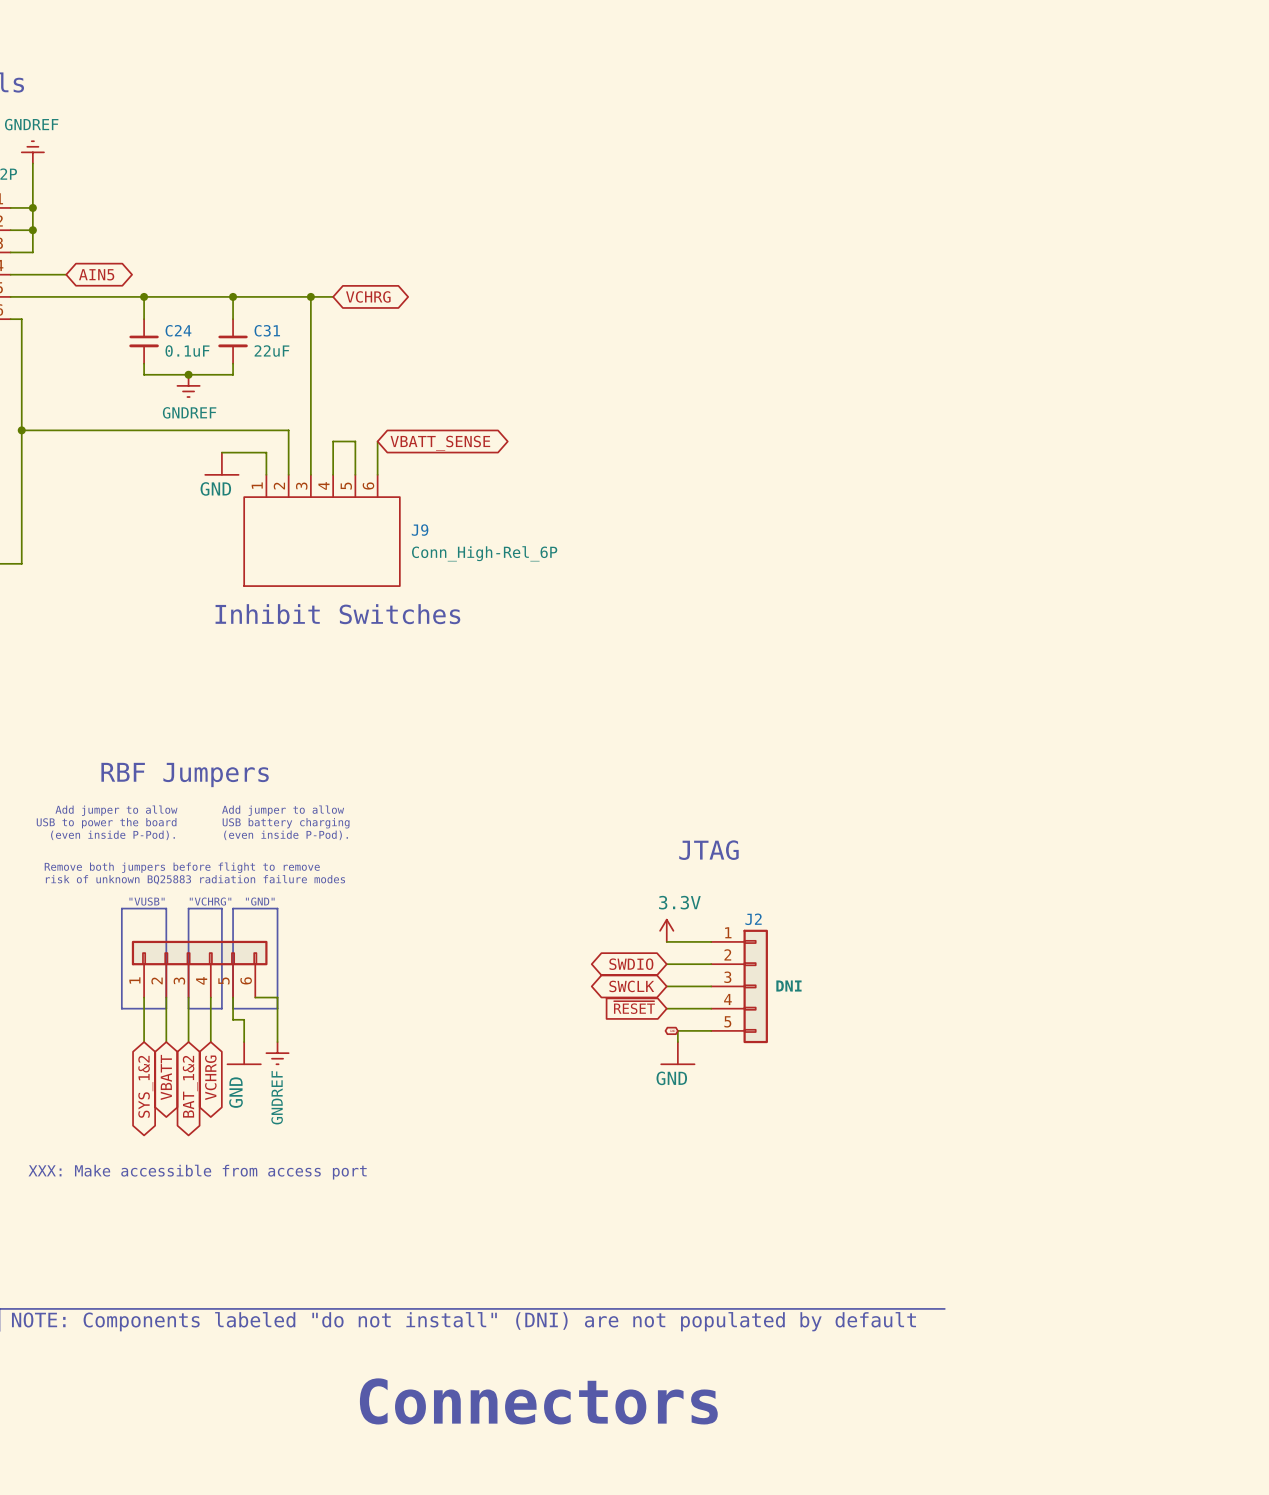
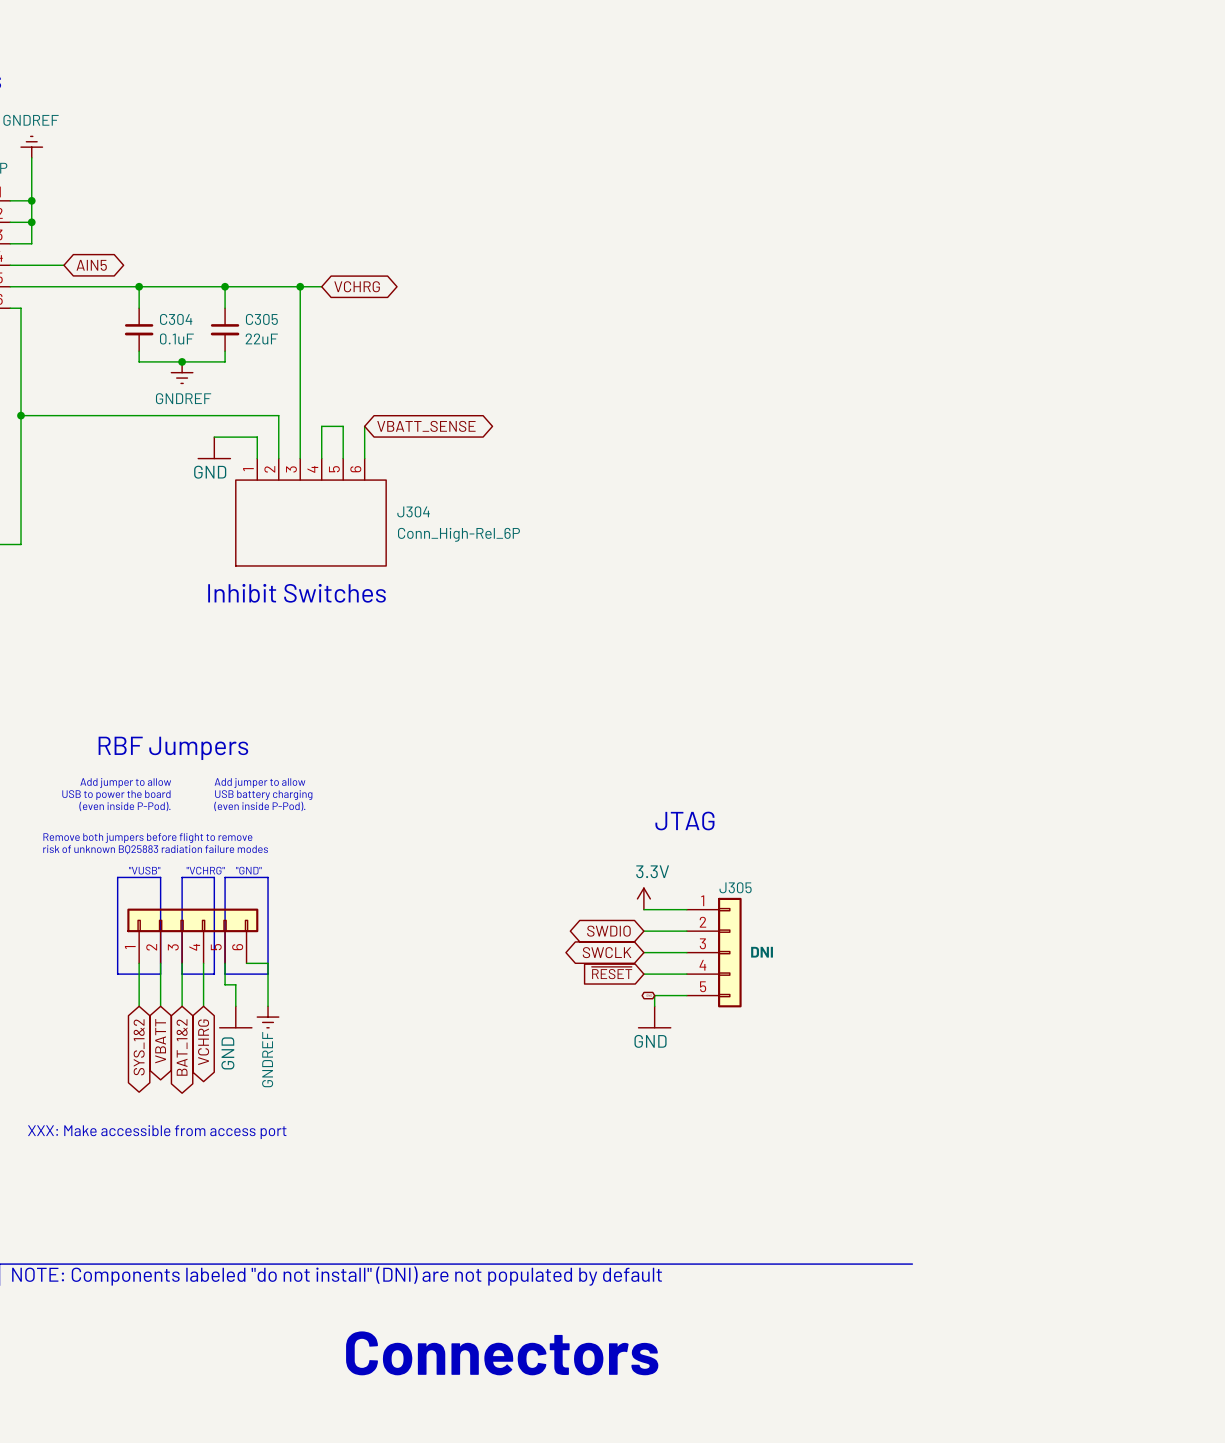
C24 name: C24 (178, 330) -> C304 (176, 319)
C31 name: C31 (267, 330) -> C305 (261, 319)
J9 name: J9 (420, 530) -> J304 (413, 511)
J2 name: J2 (753, 919) -> J305 (735, 887)

